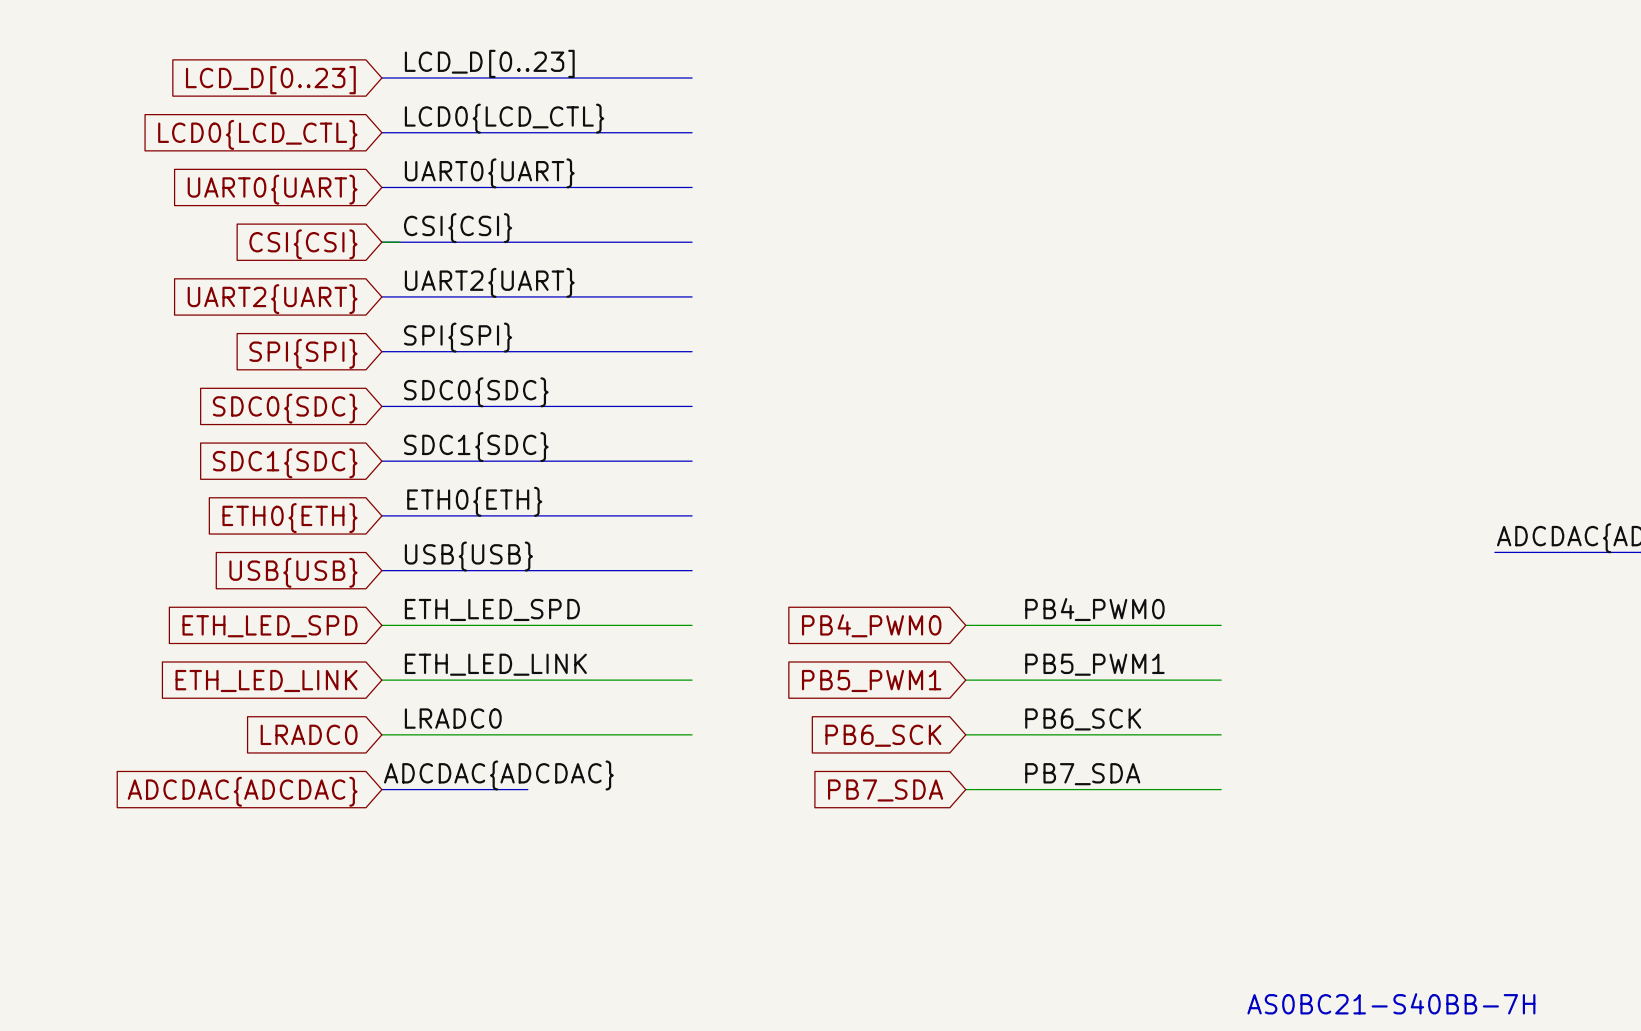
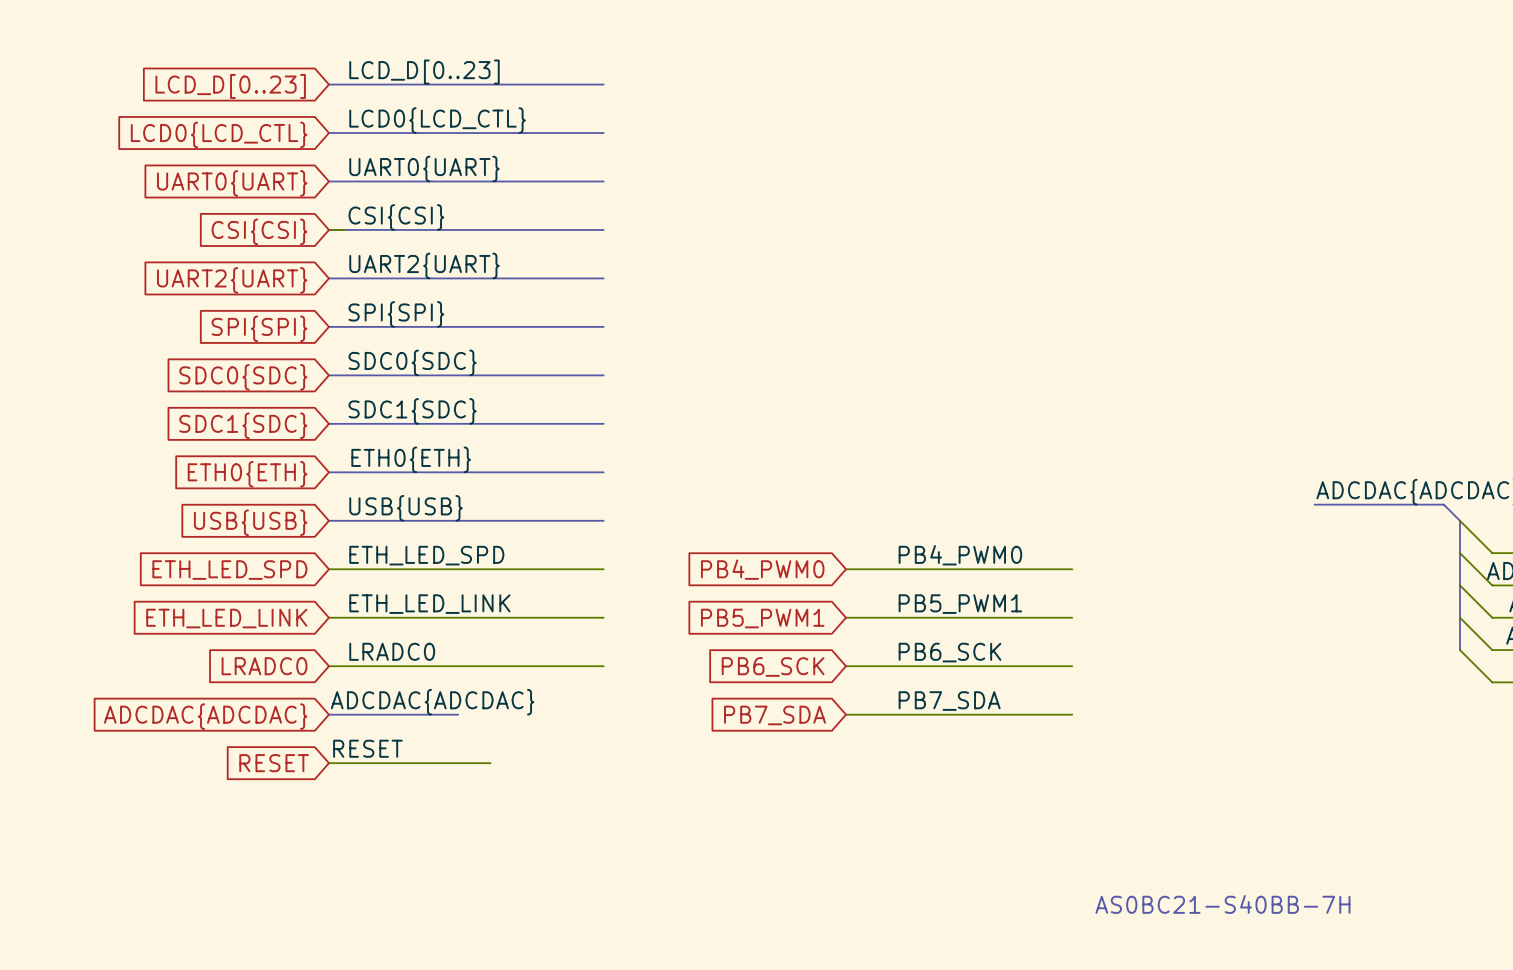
label: none -> RESET (367, 748)
global label: none -> RESET (274, 763)
wire: none -> (328, 763) (490, 763)

